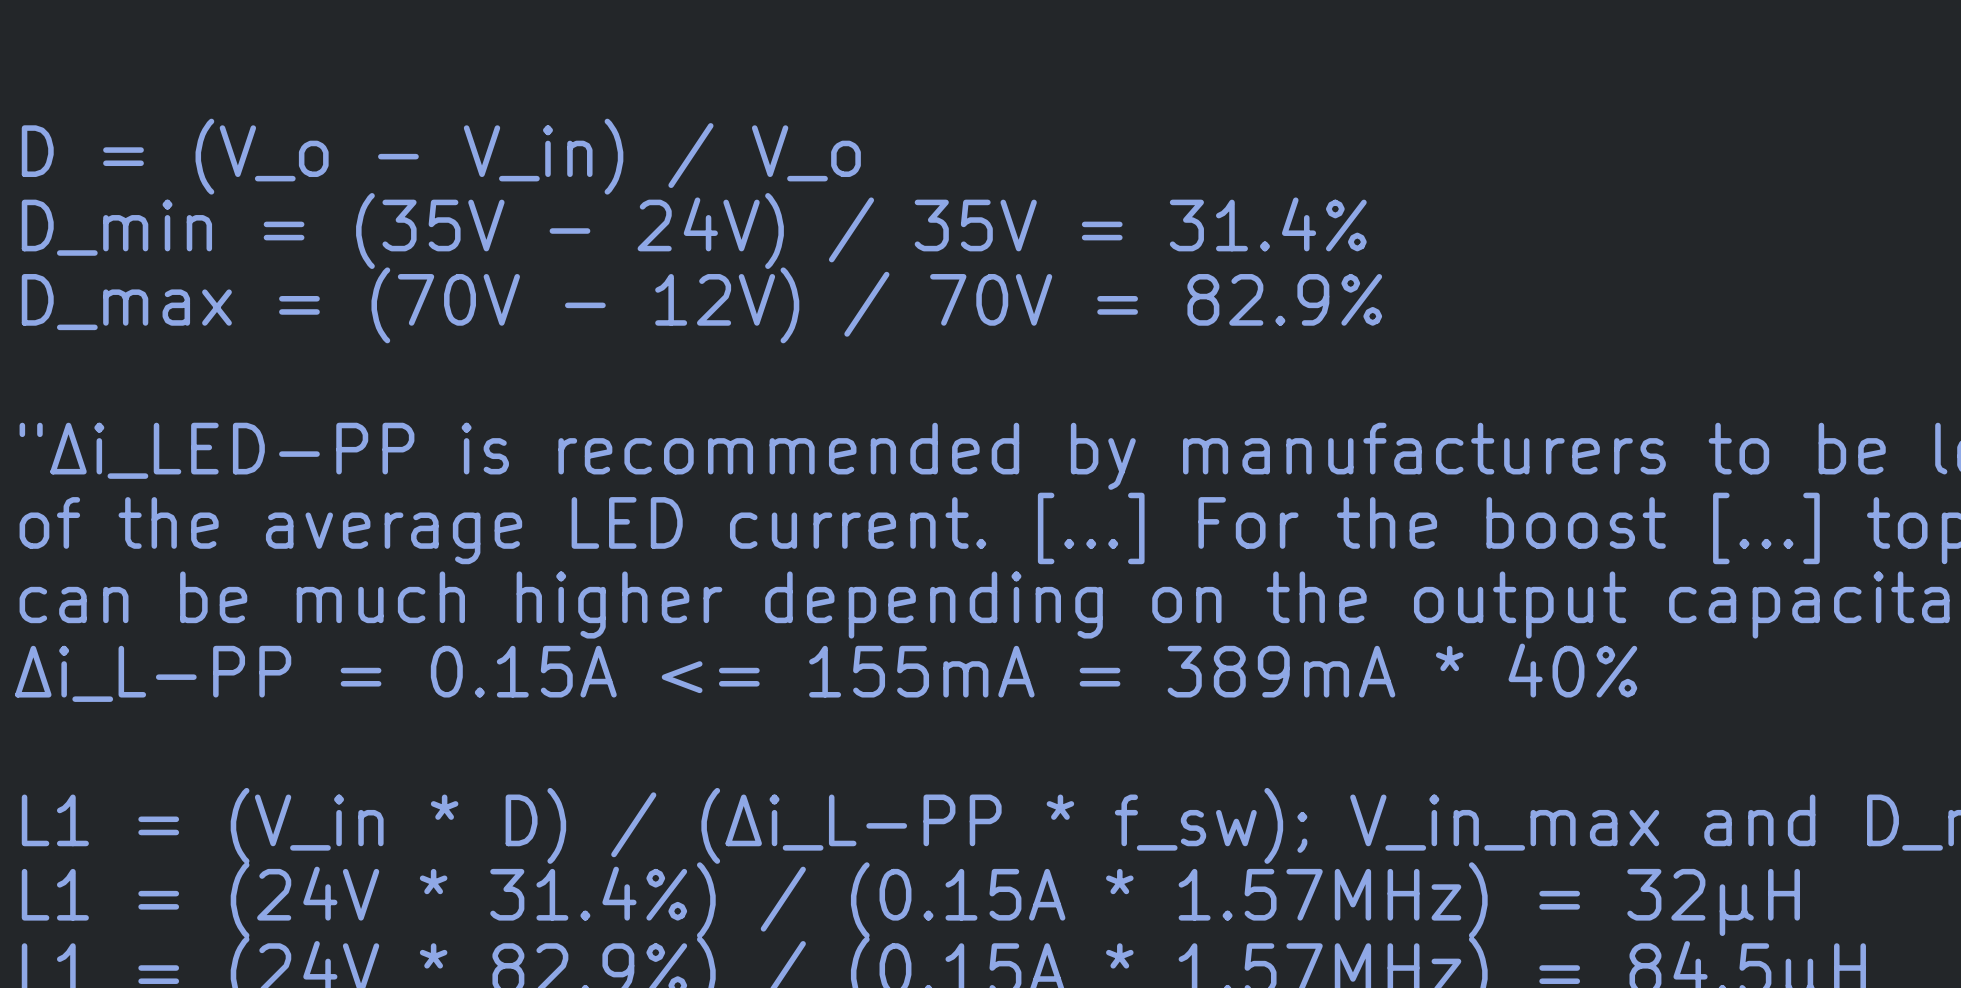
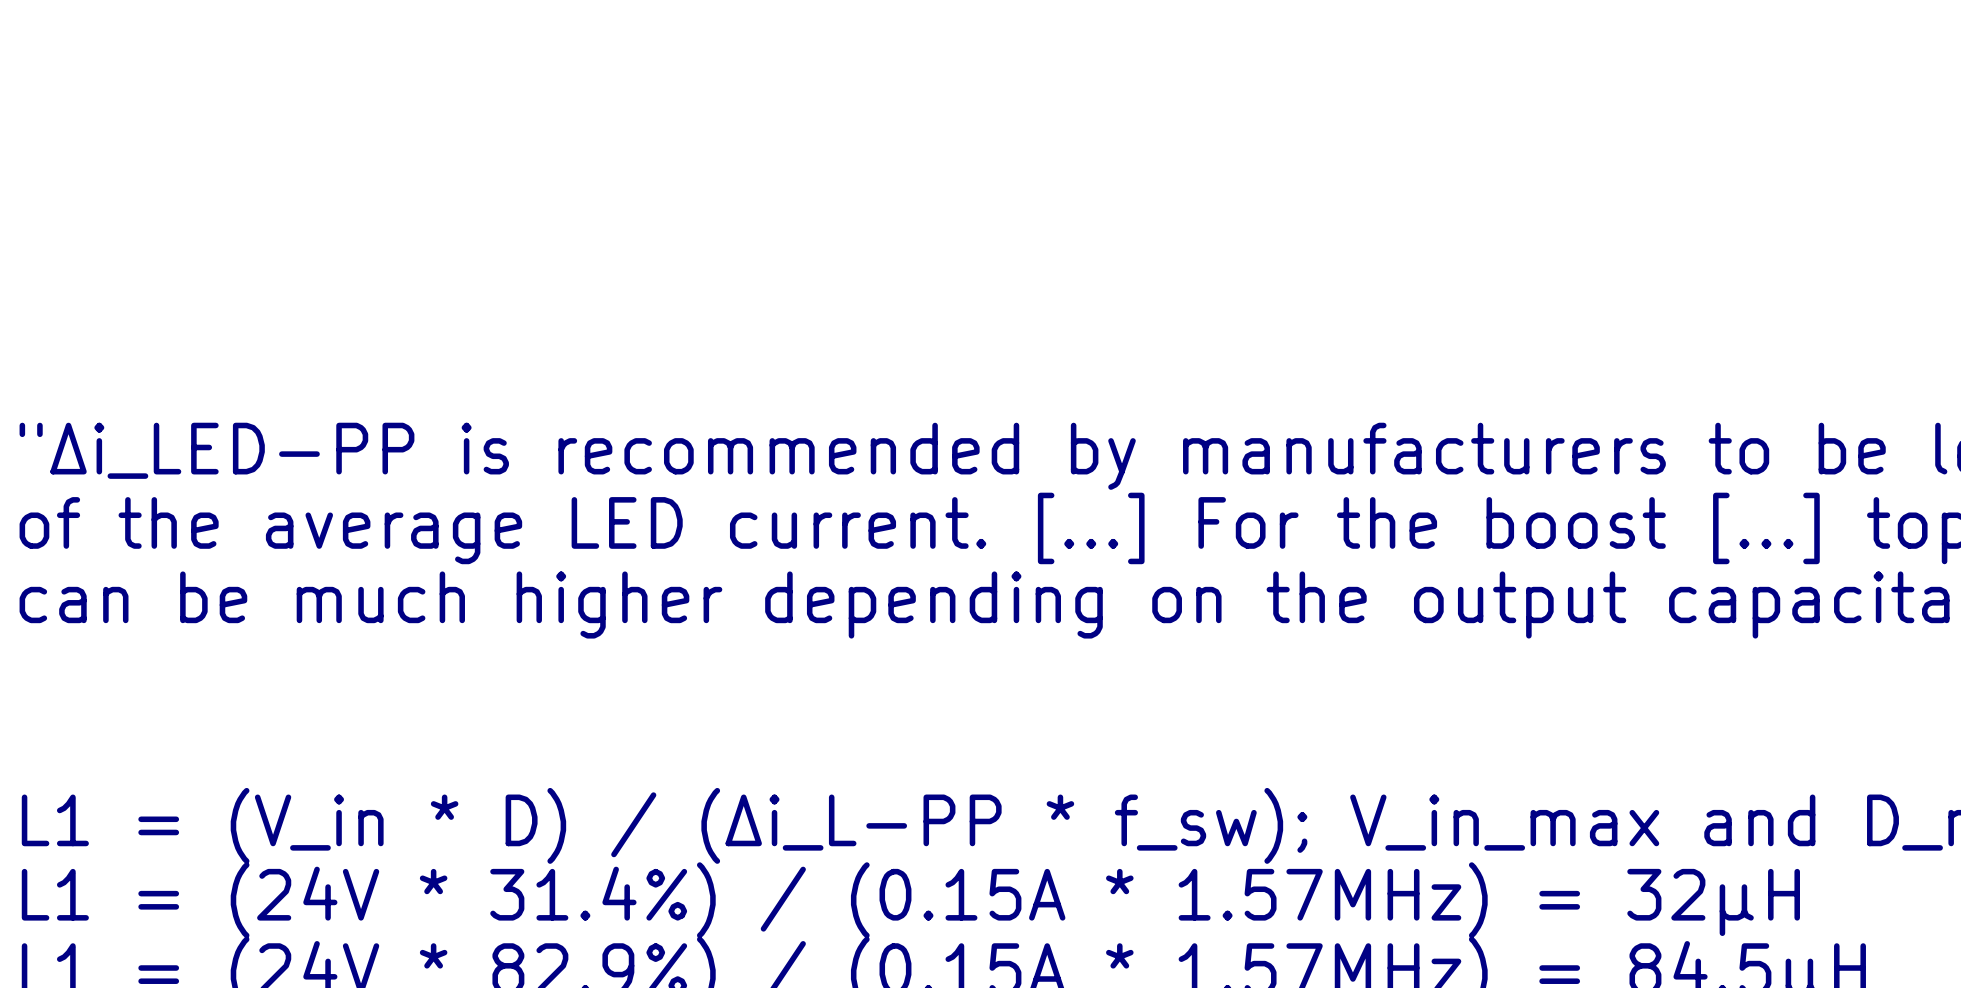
text: D = (V_o - V_in) / V_o (441, 156) -> none
text: D_min = (35V - 24V) / 35V = 31.4% (694, 231) -> none
text: D_max = (70V - 12V) / 70V = 82.9% (701, 305) -> none
text: Δi_L-PP = 0.15A <= 155mA = 389mA * 40% (826, 672) -> none

